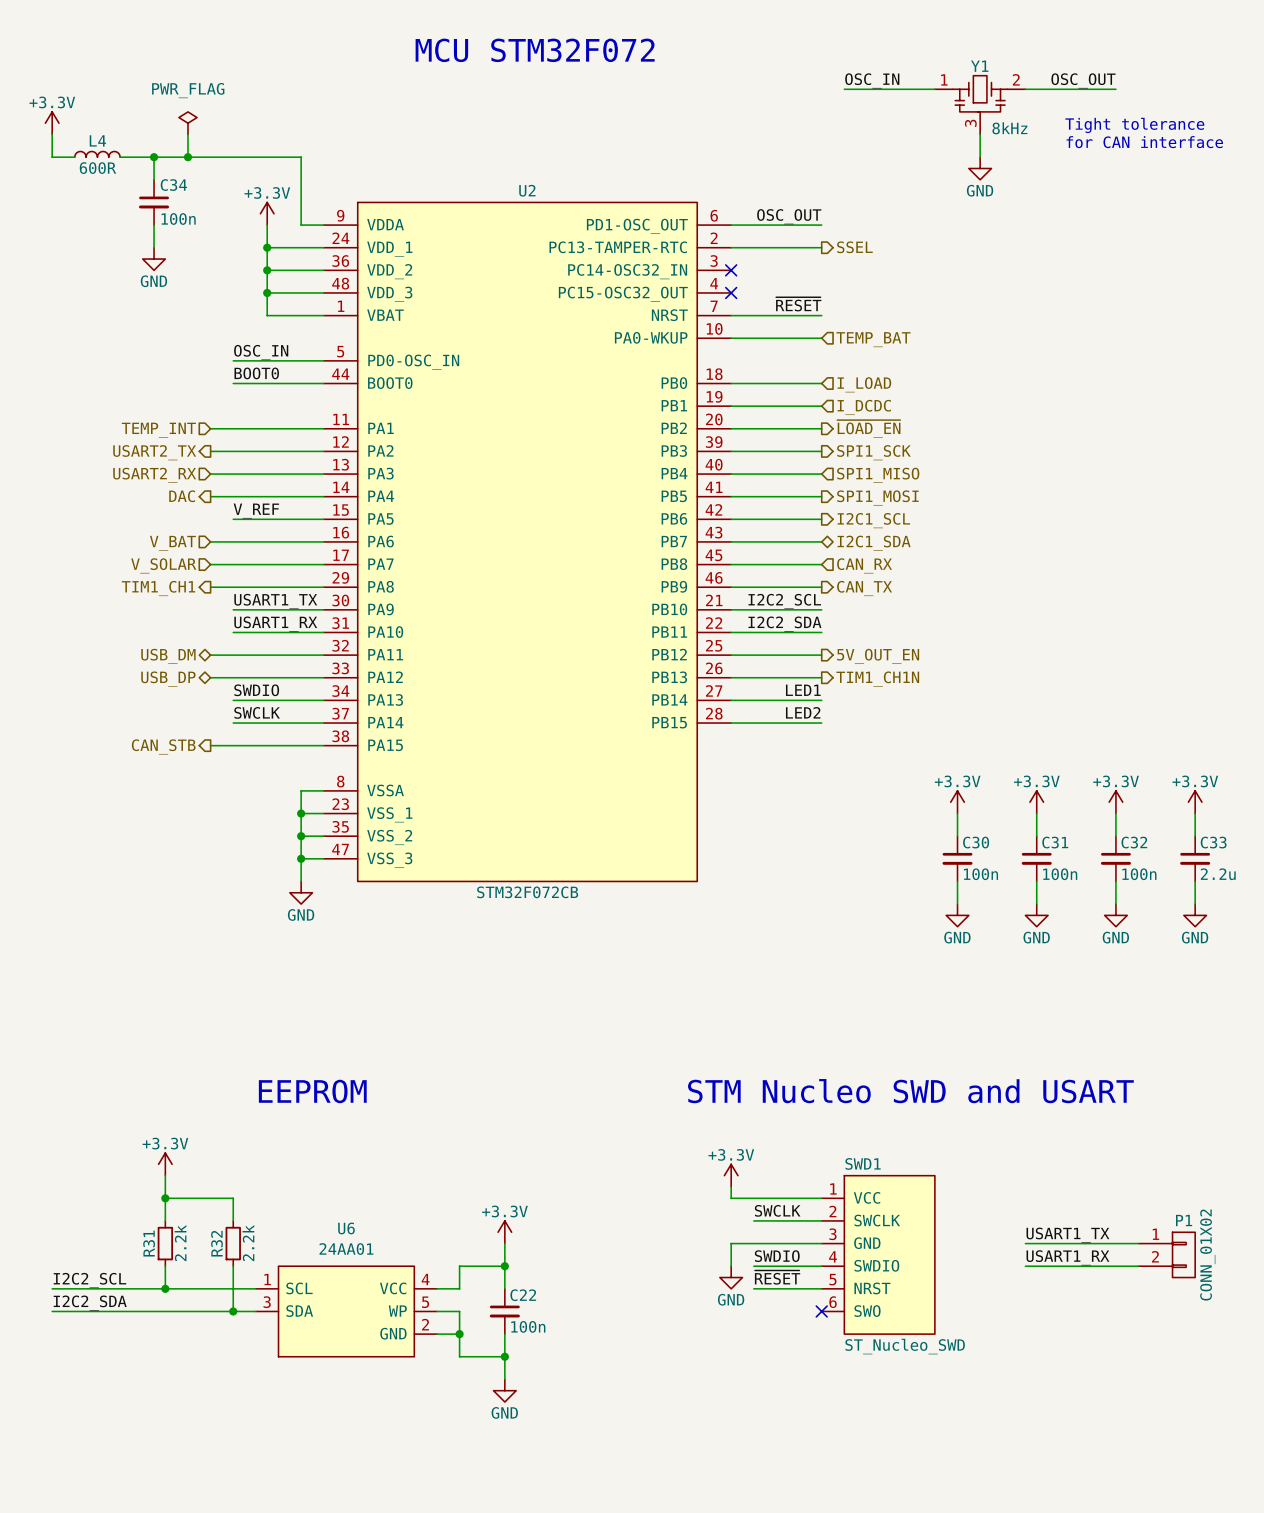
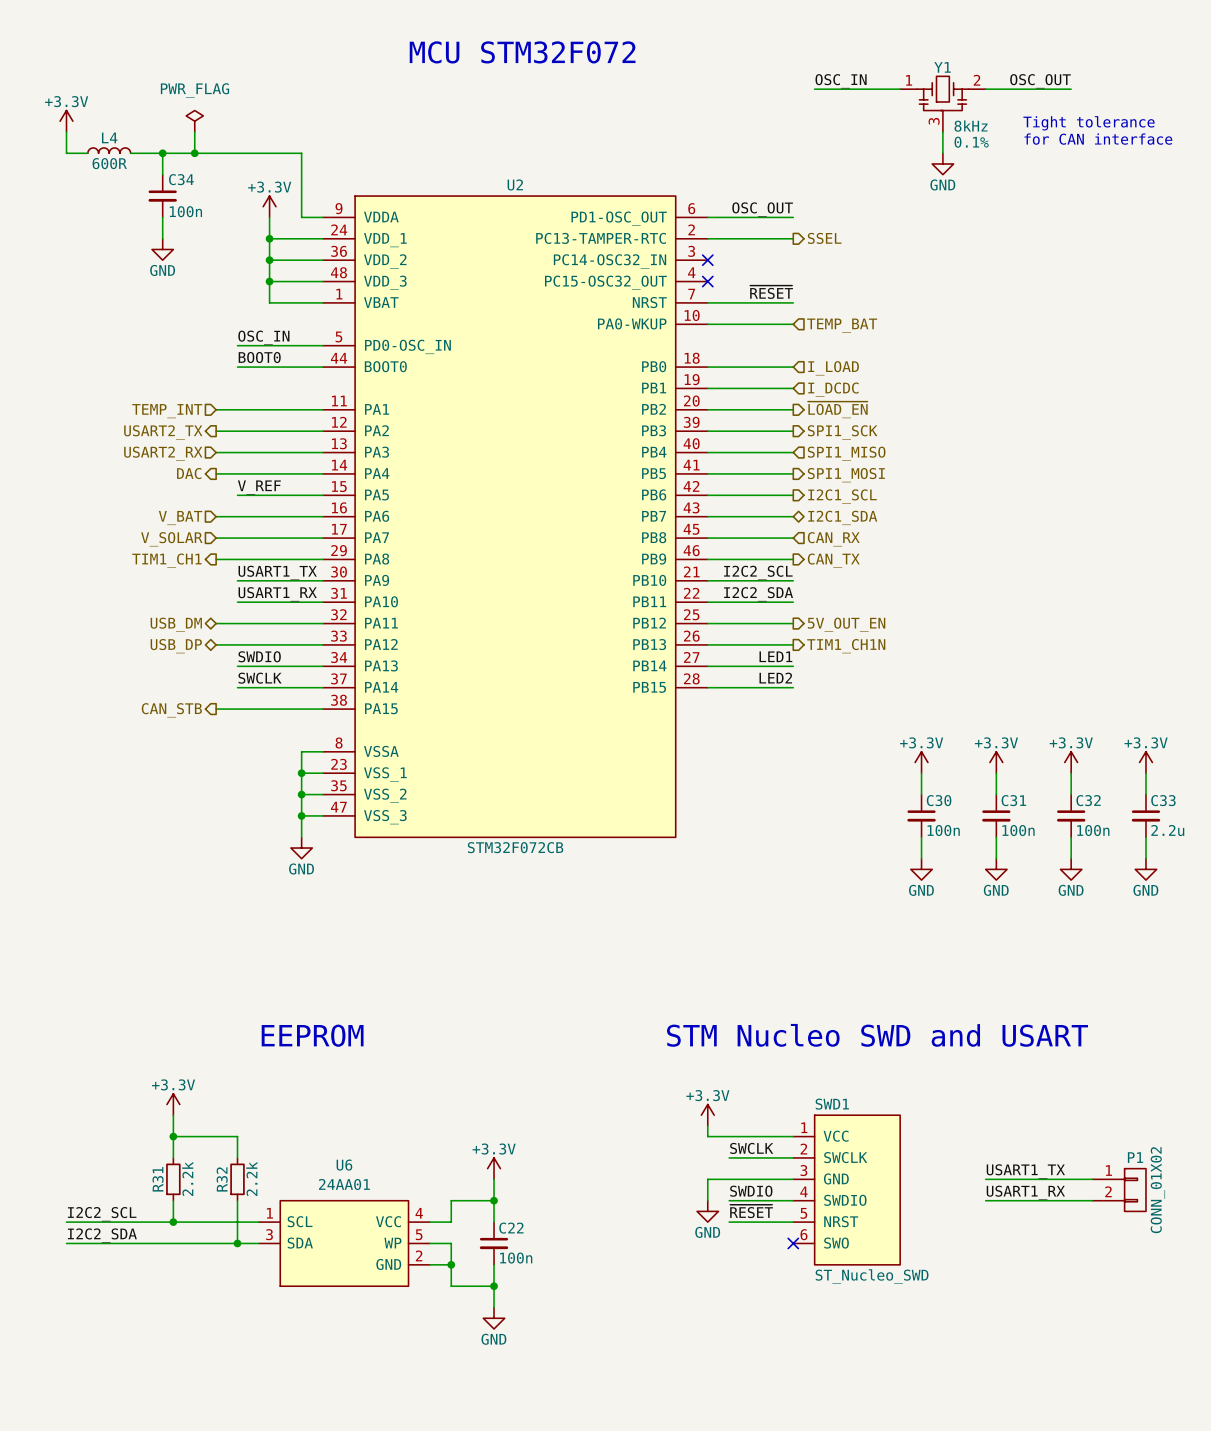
Y1 text: none -> 0.1% (971, 142)

